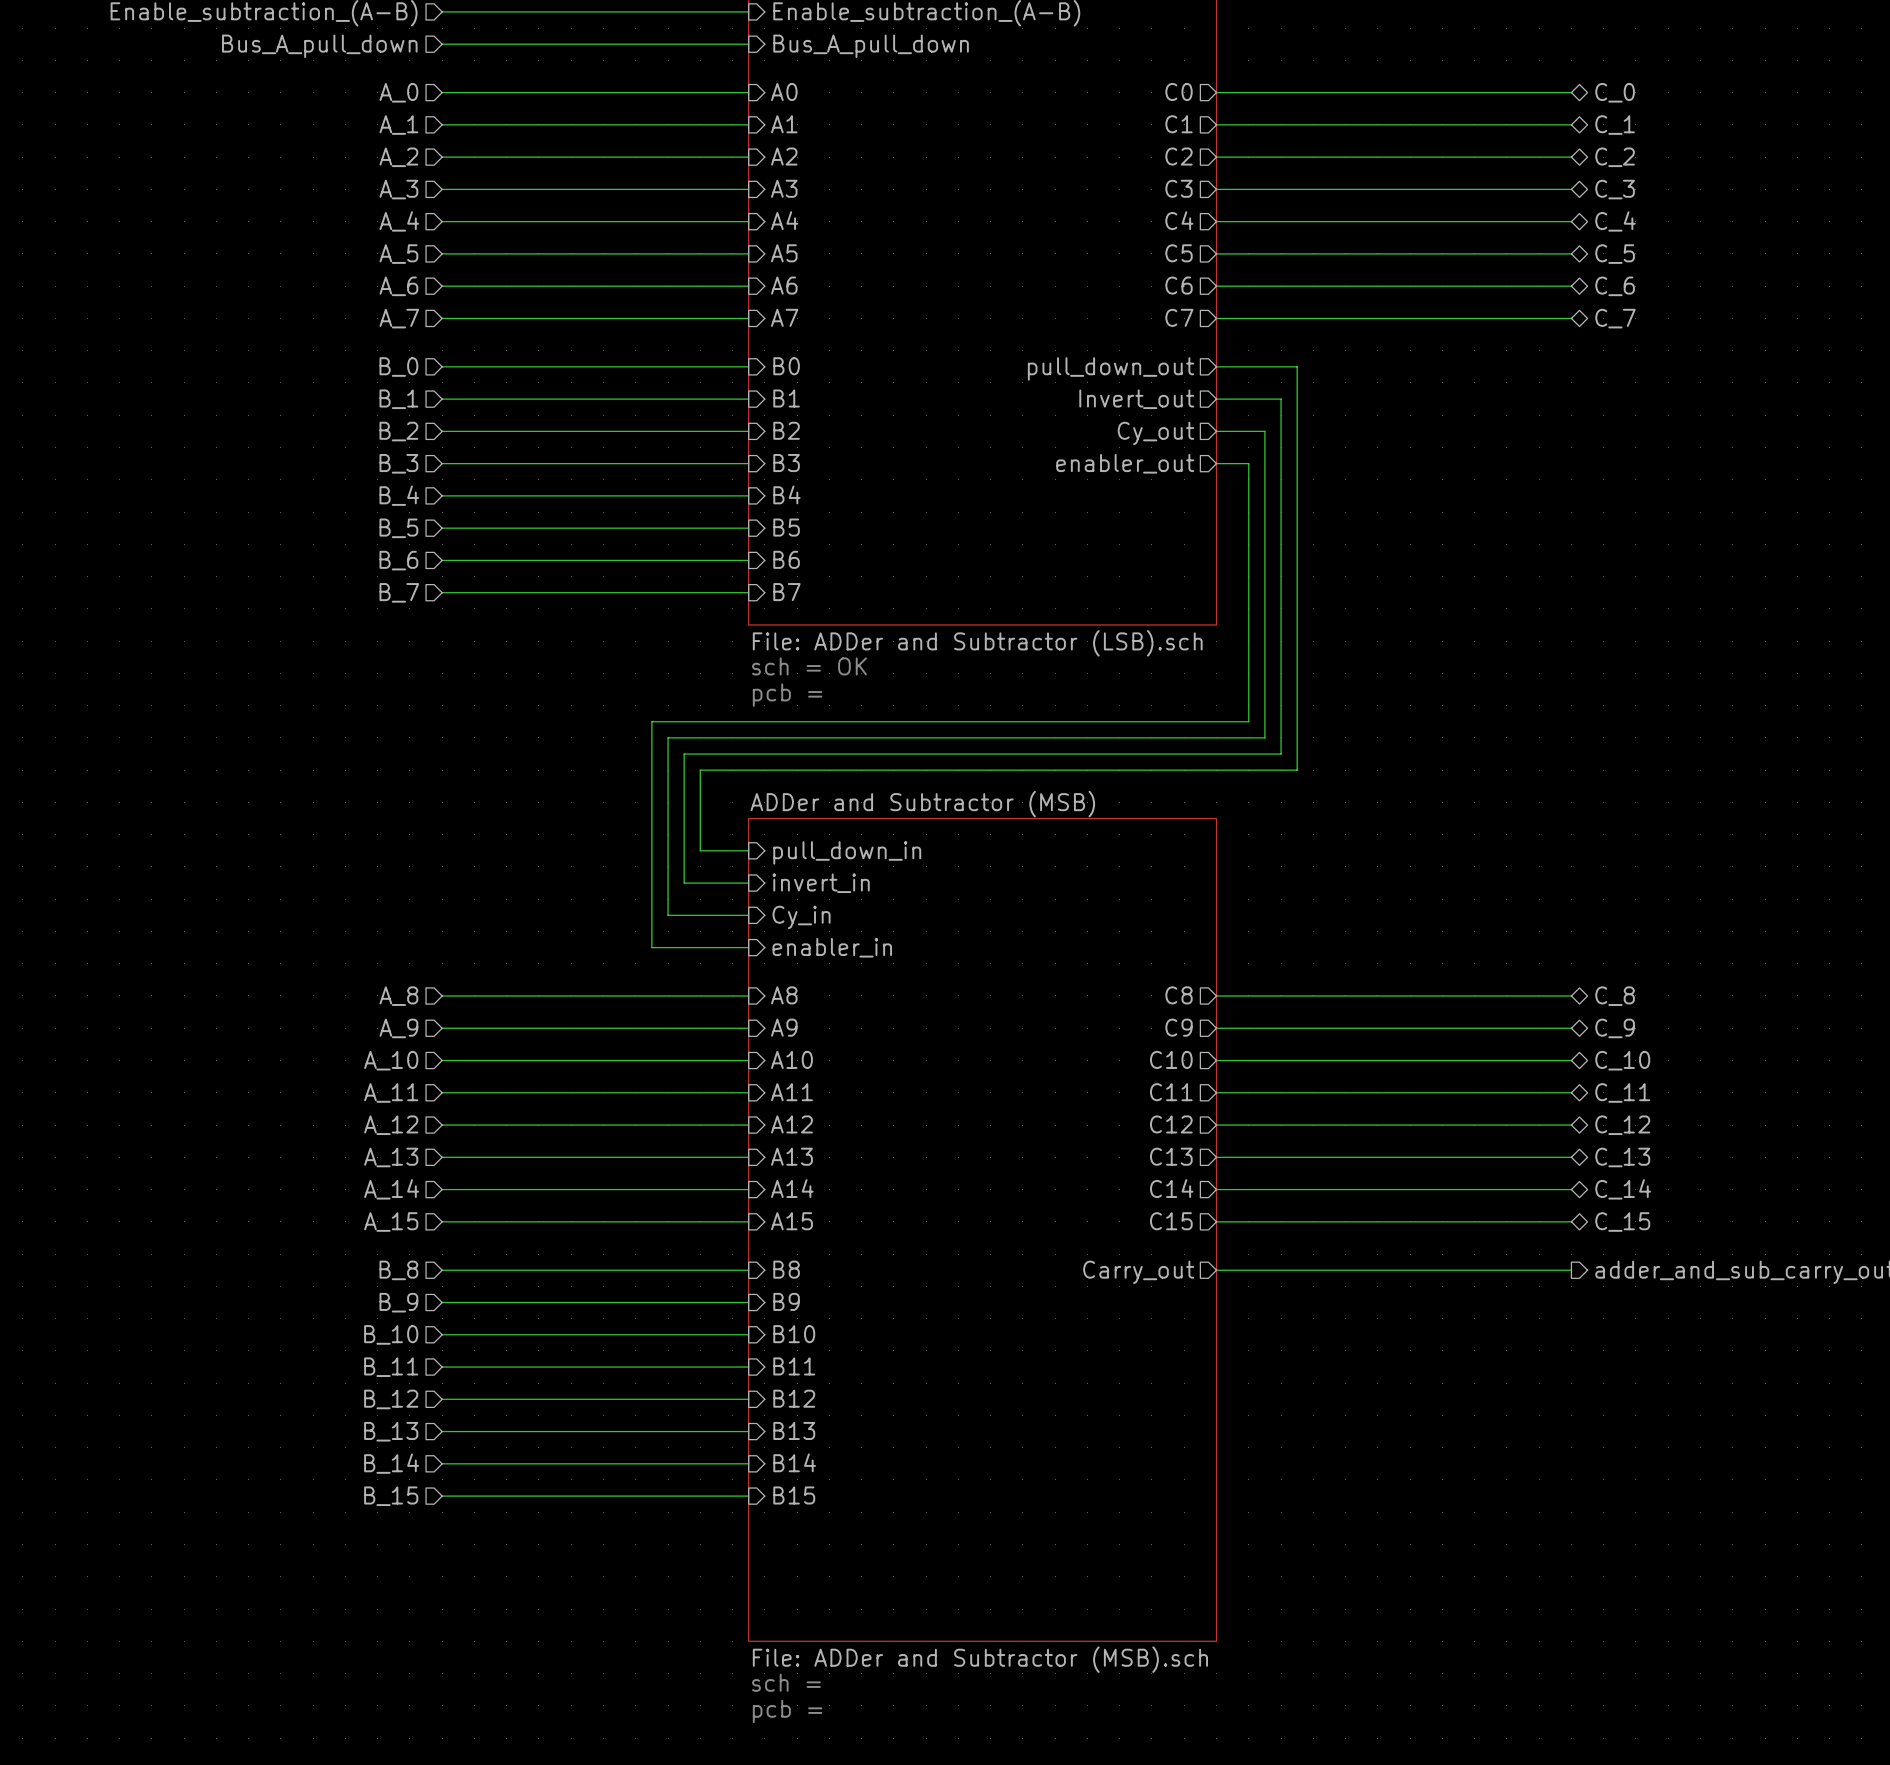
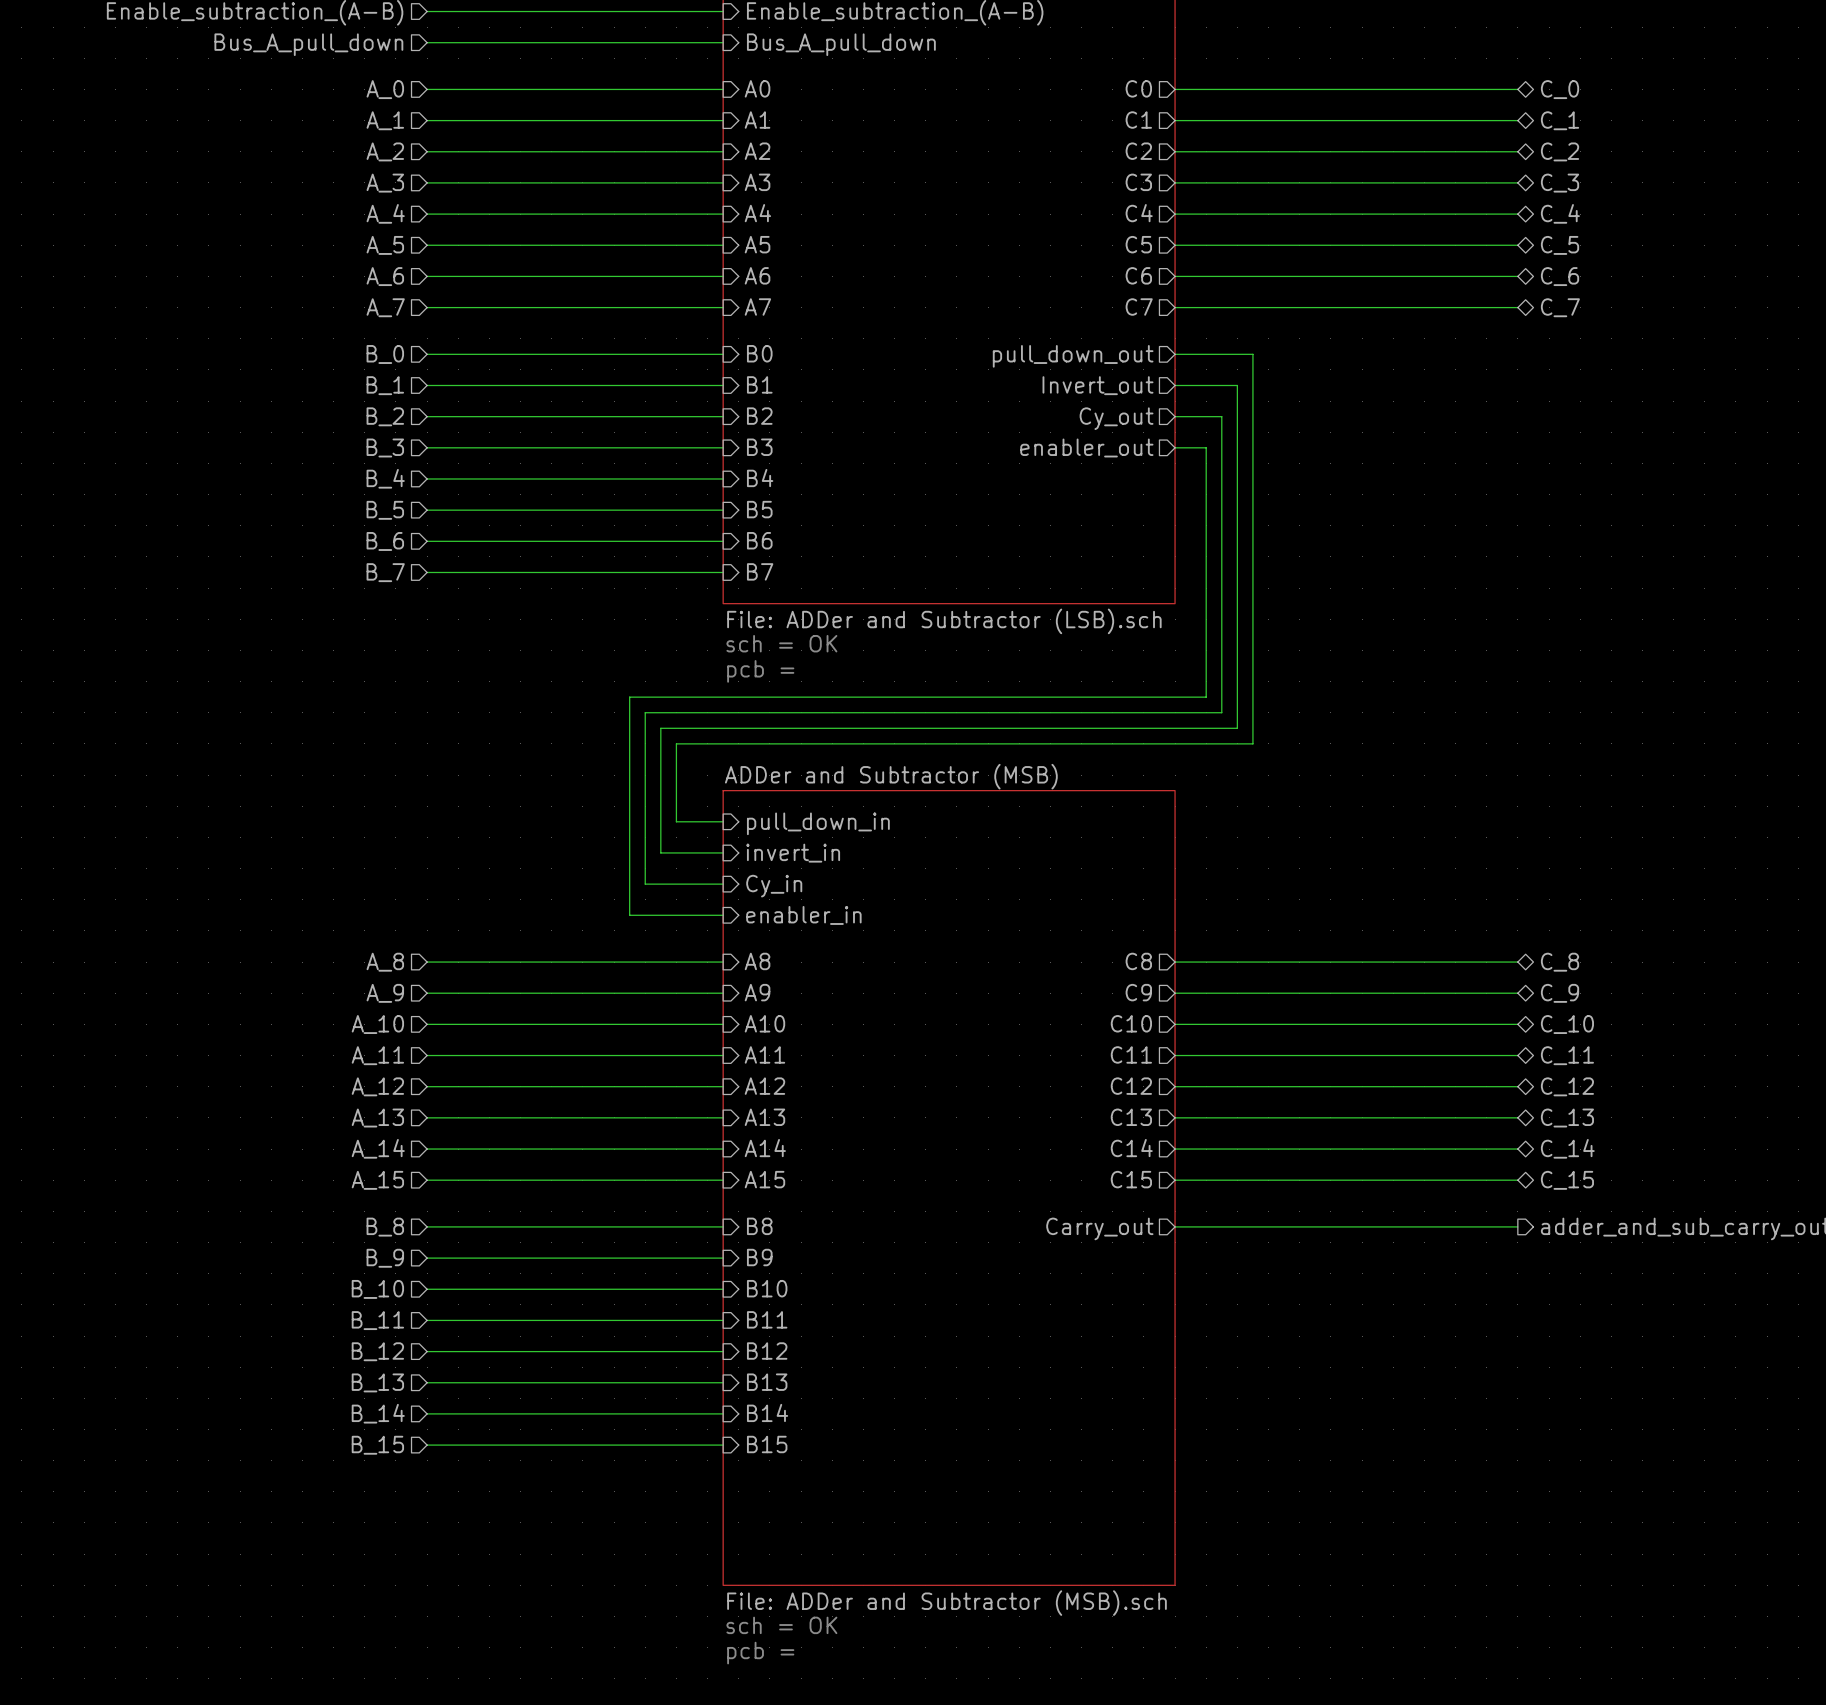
text: sch = (786, 1682) -> sch = OK (781, 1625)

